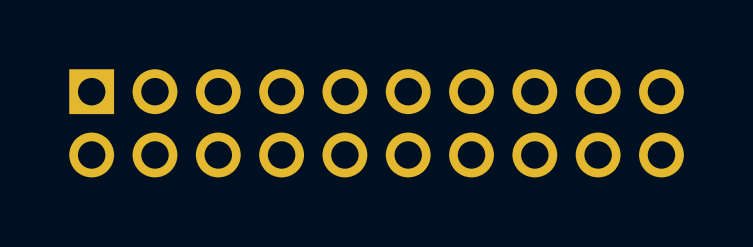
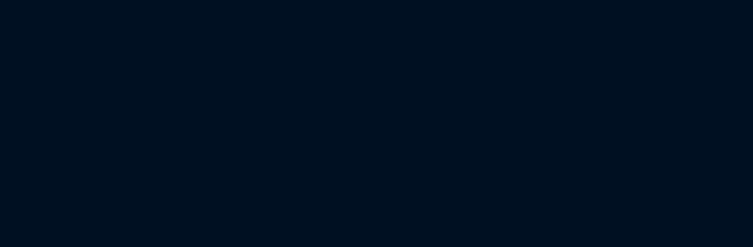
part: (376, 123) -> none

